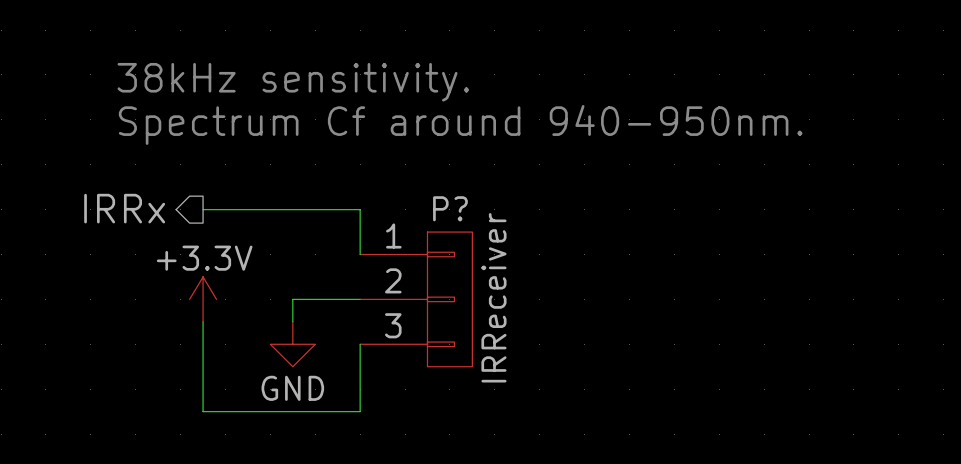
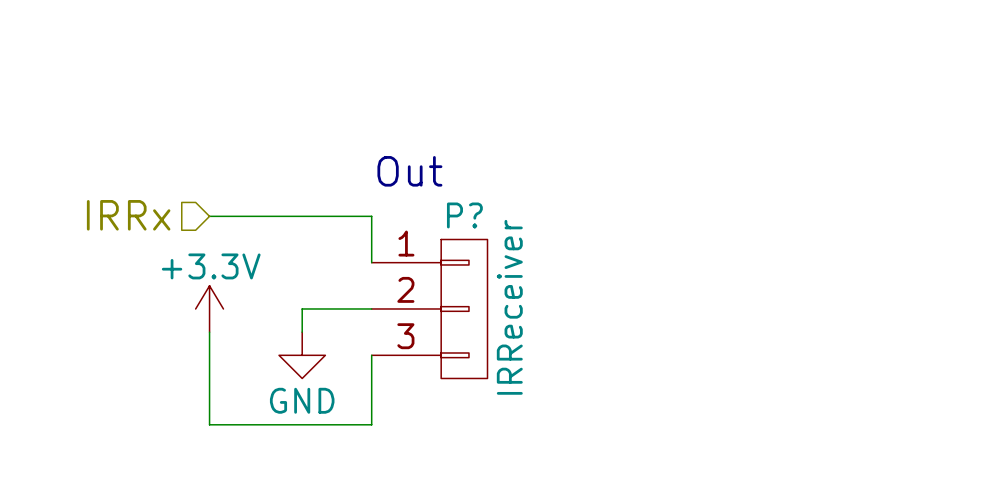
text: 38kHz sensitivity. (293, 82) -> none
text: Spectrum Cf around 940-950nm. (460, 124) -> none
text: none -> Out (409, 171)
hierarchical label shape: output (124, 208) -> input (128, 215)

